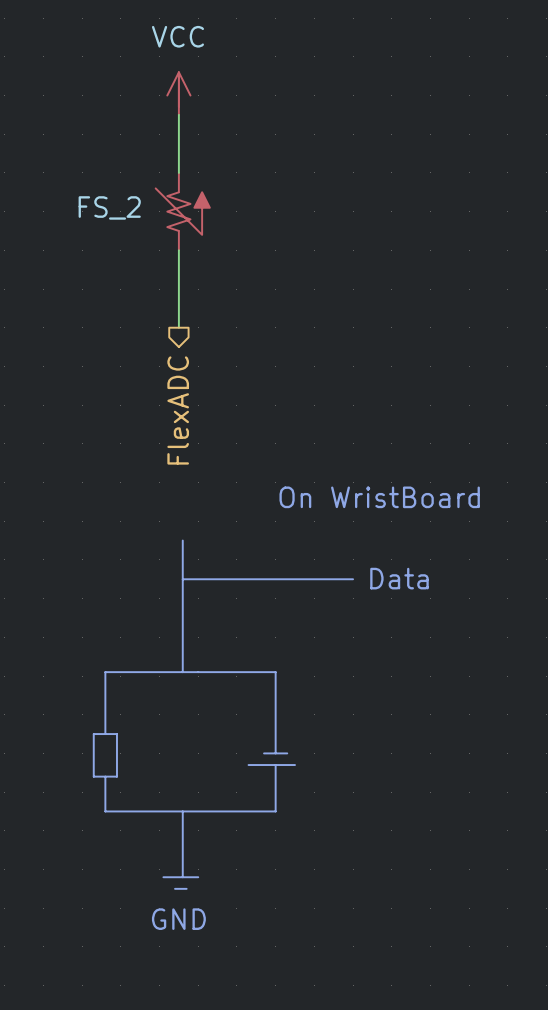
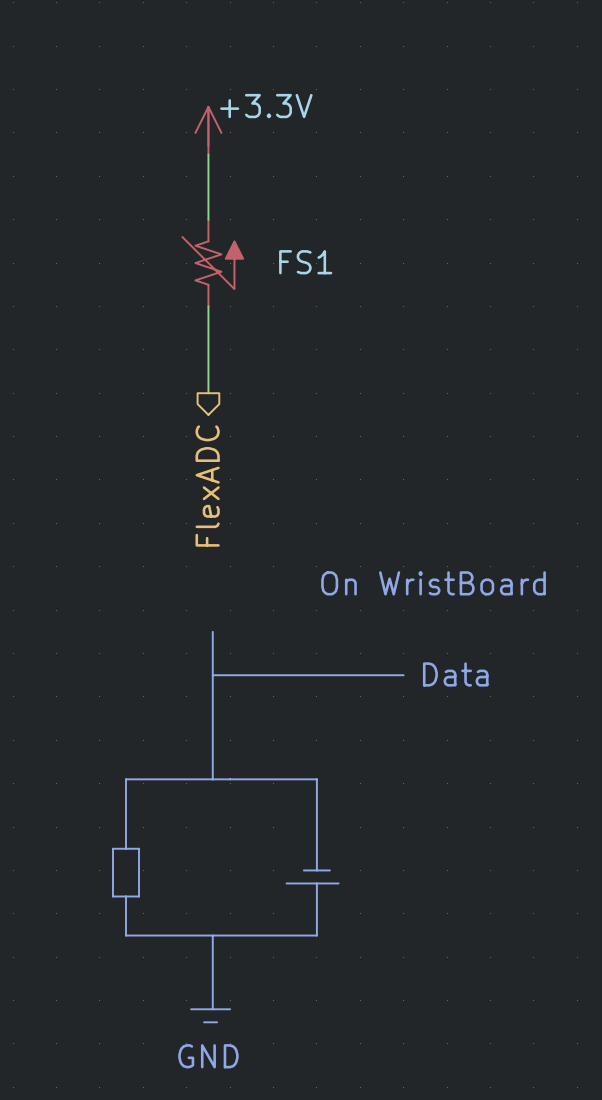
power symbol: VCC (178, 93) -> +3.3V (208, 130)
FS_2 name: FS_2 (109, 207) -> FS1 (305, 262)

